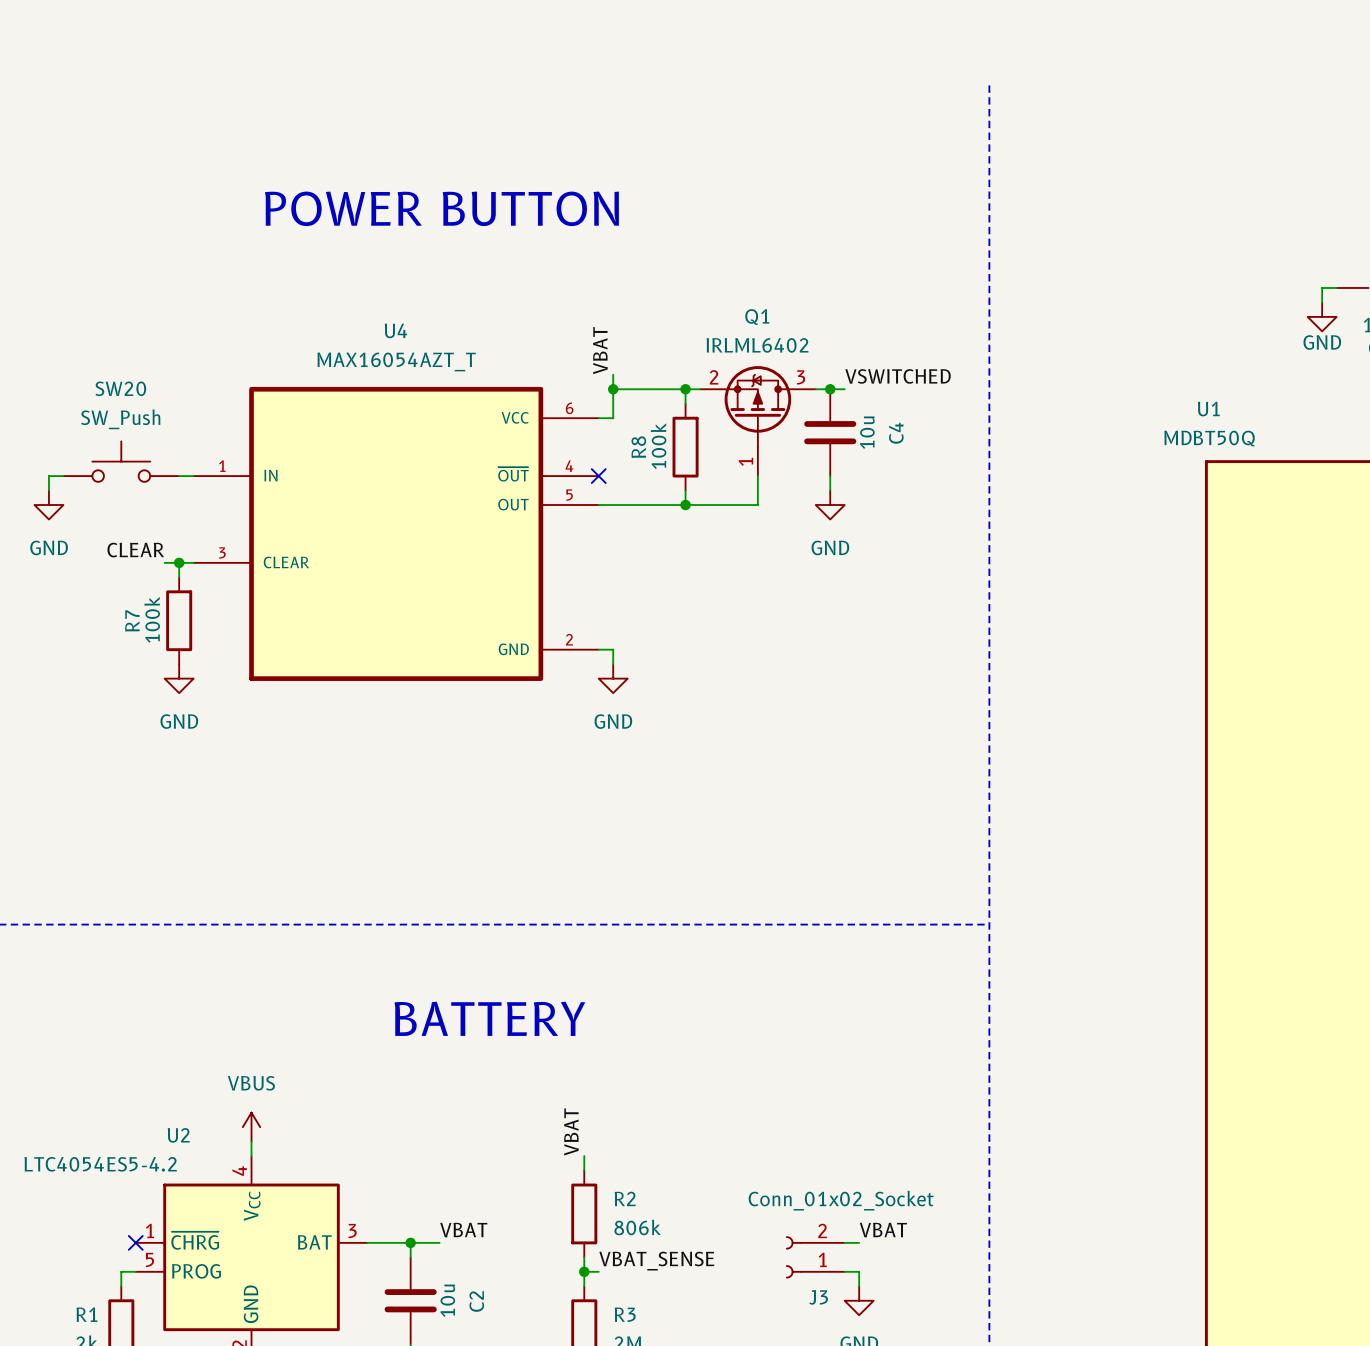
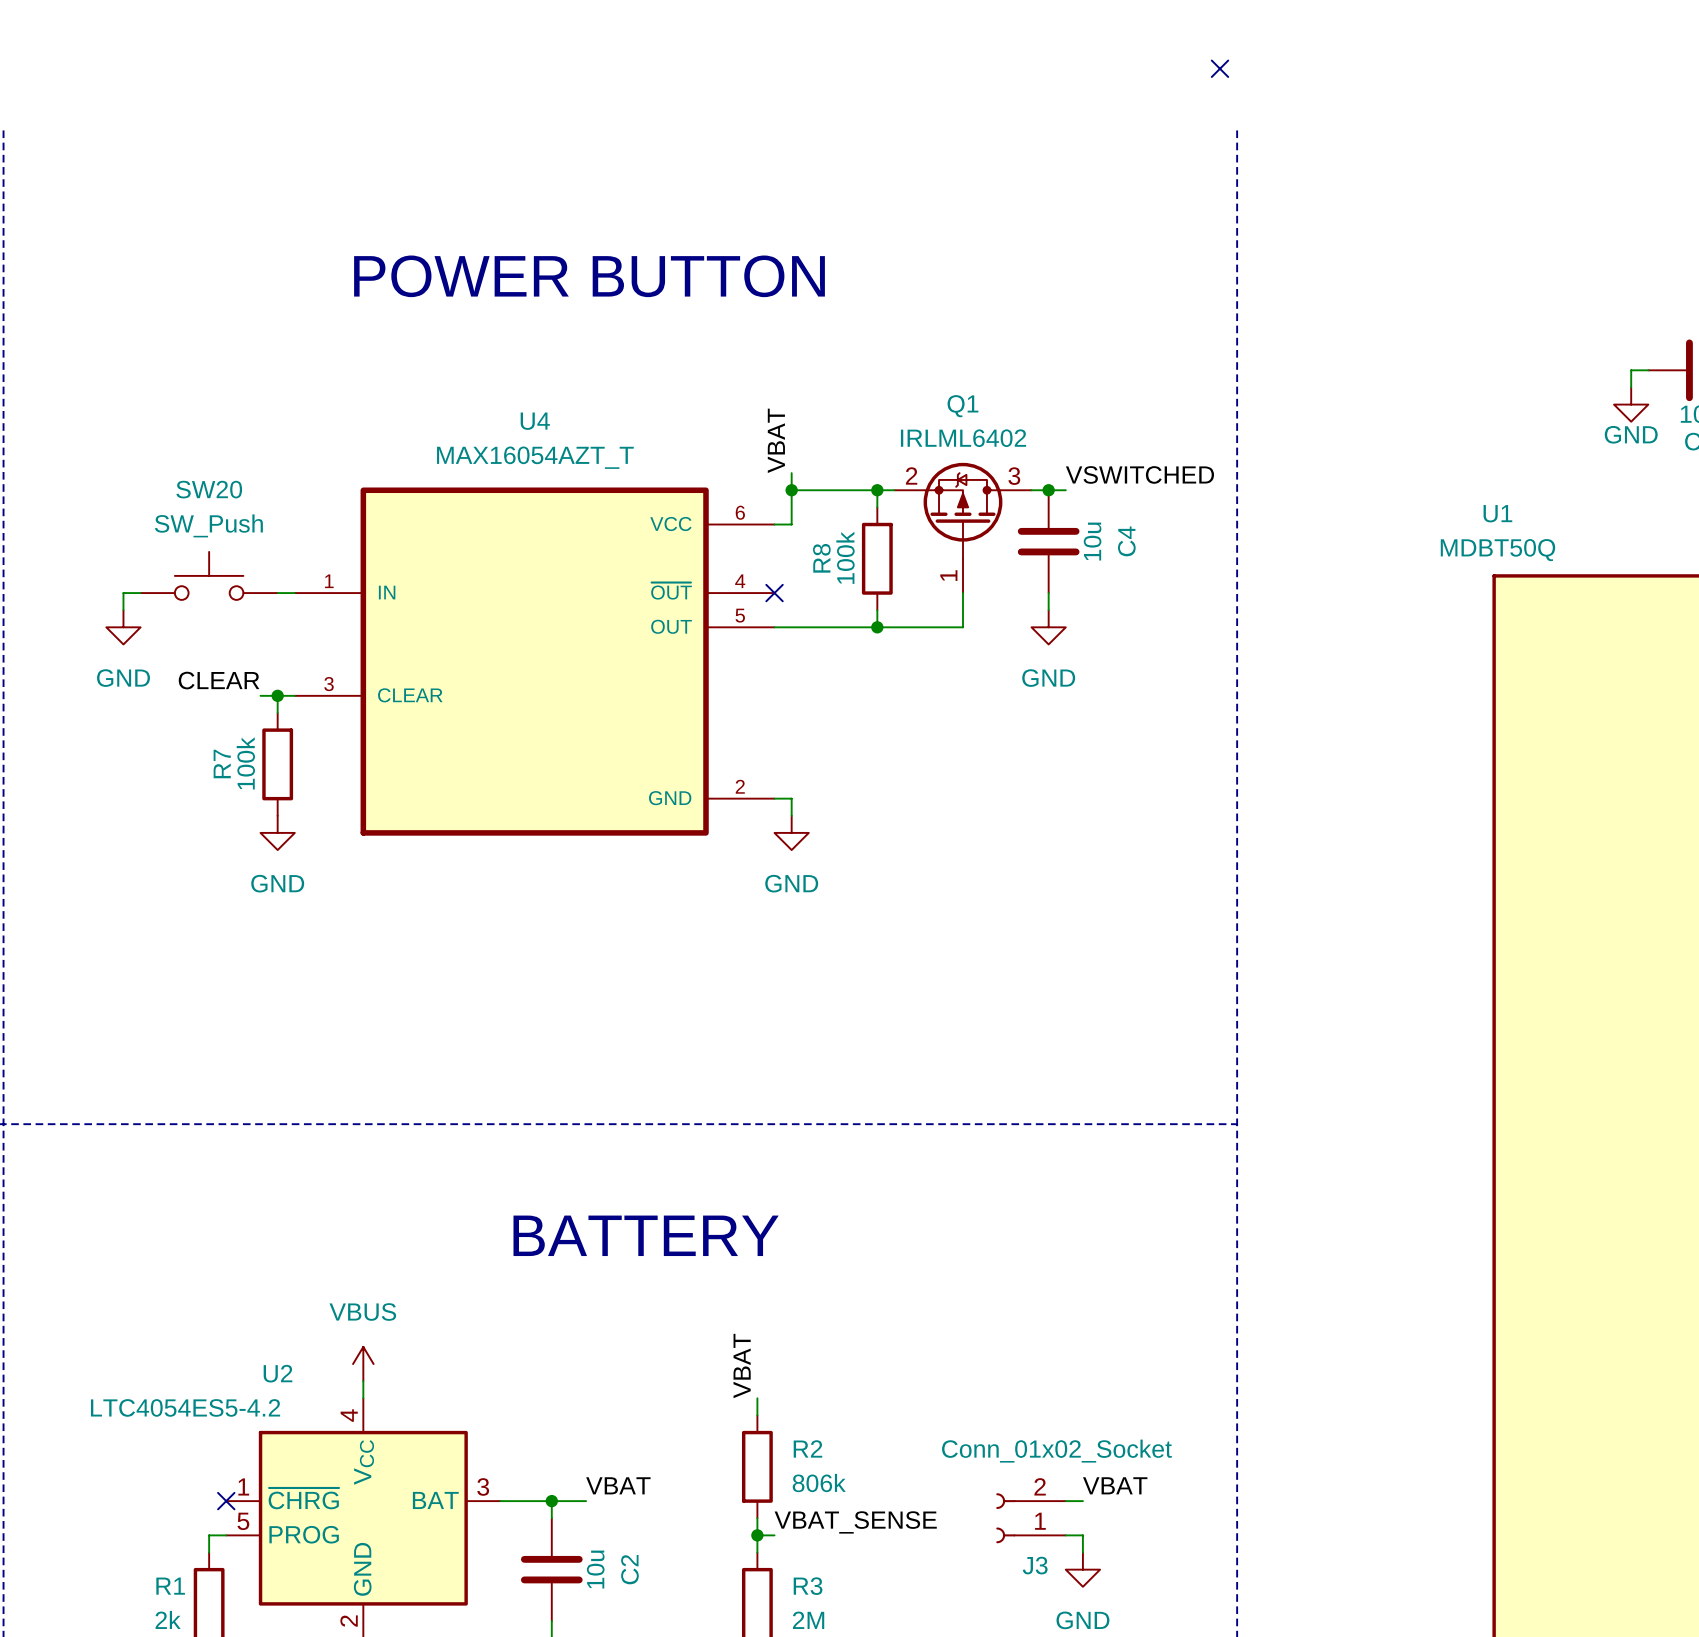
no-connect mark: none -> (1219, 68)

